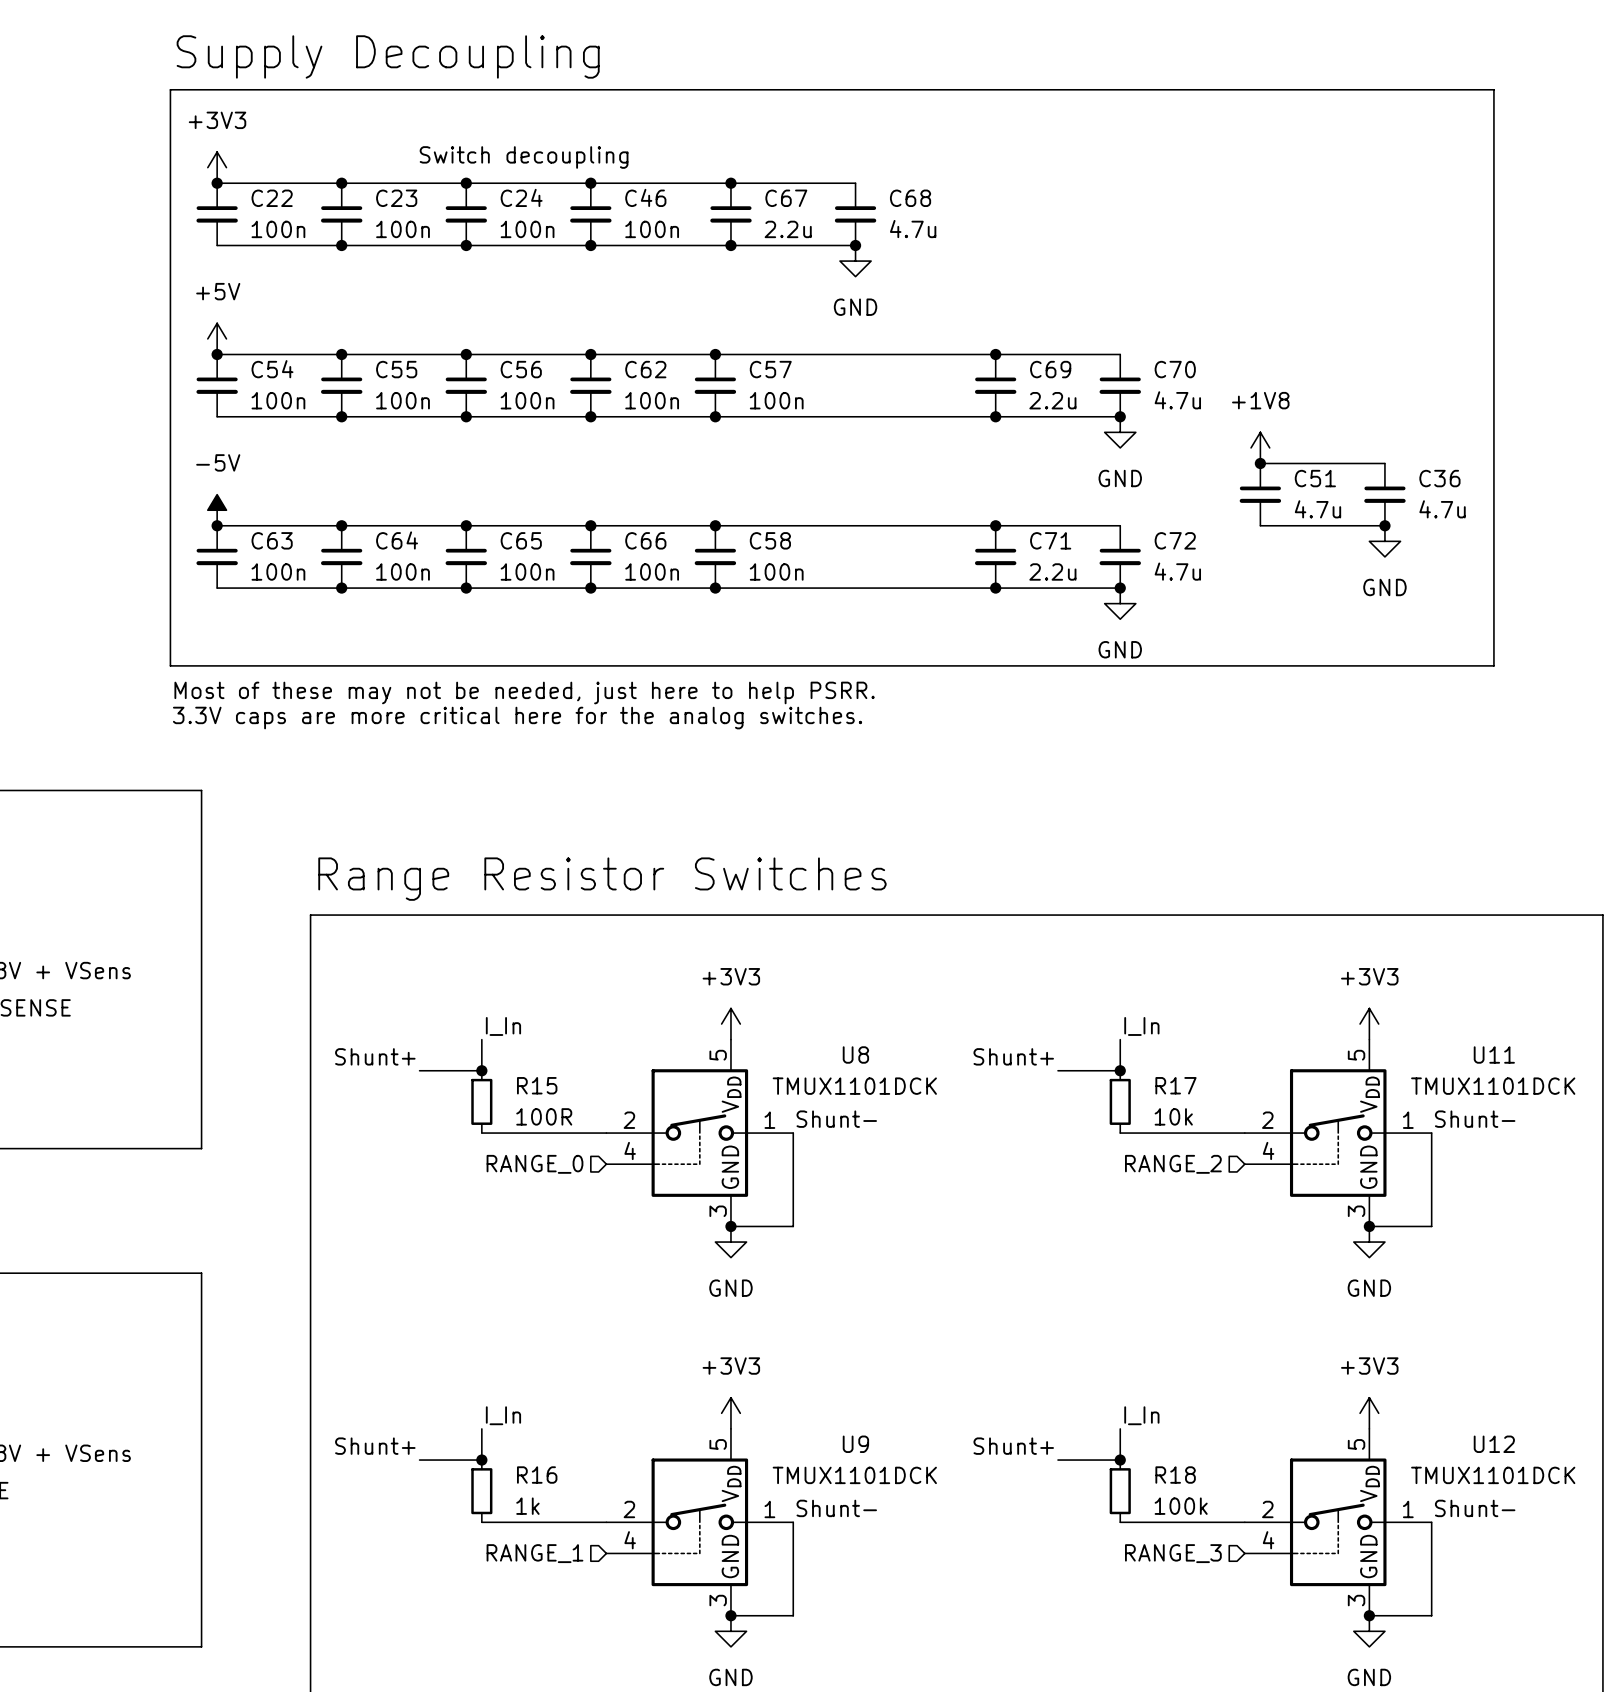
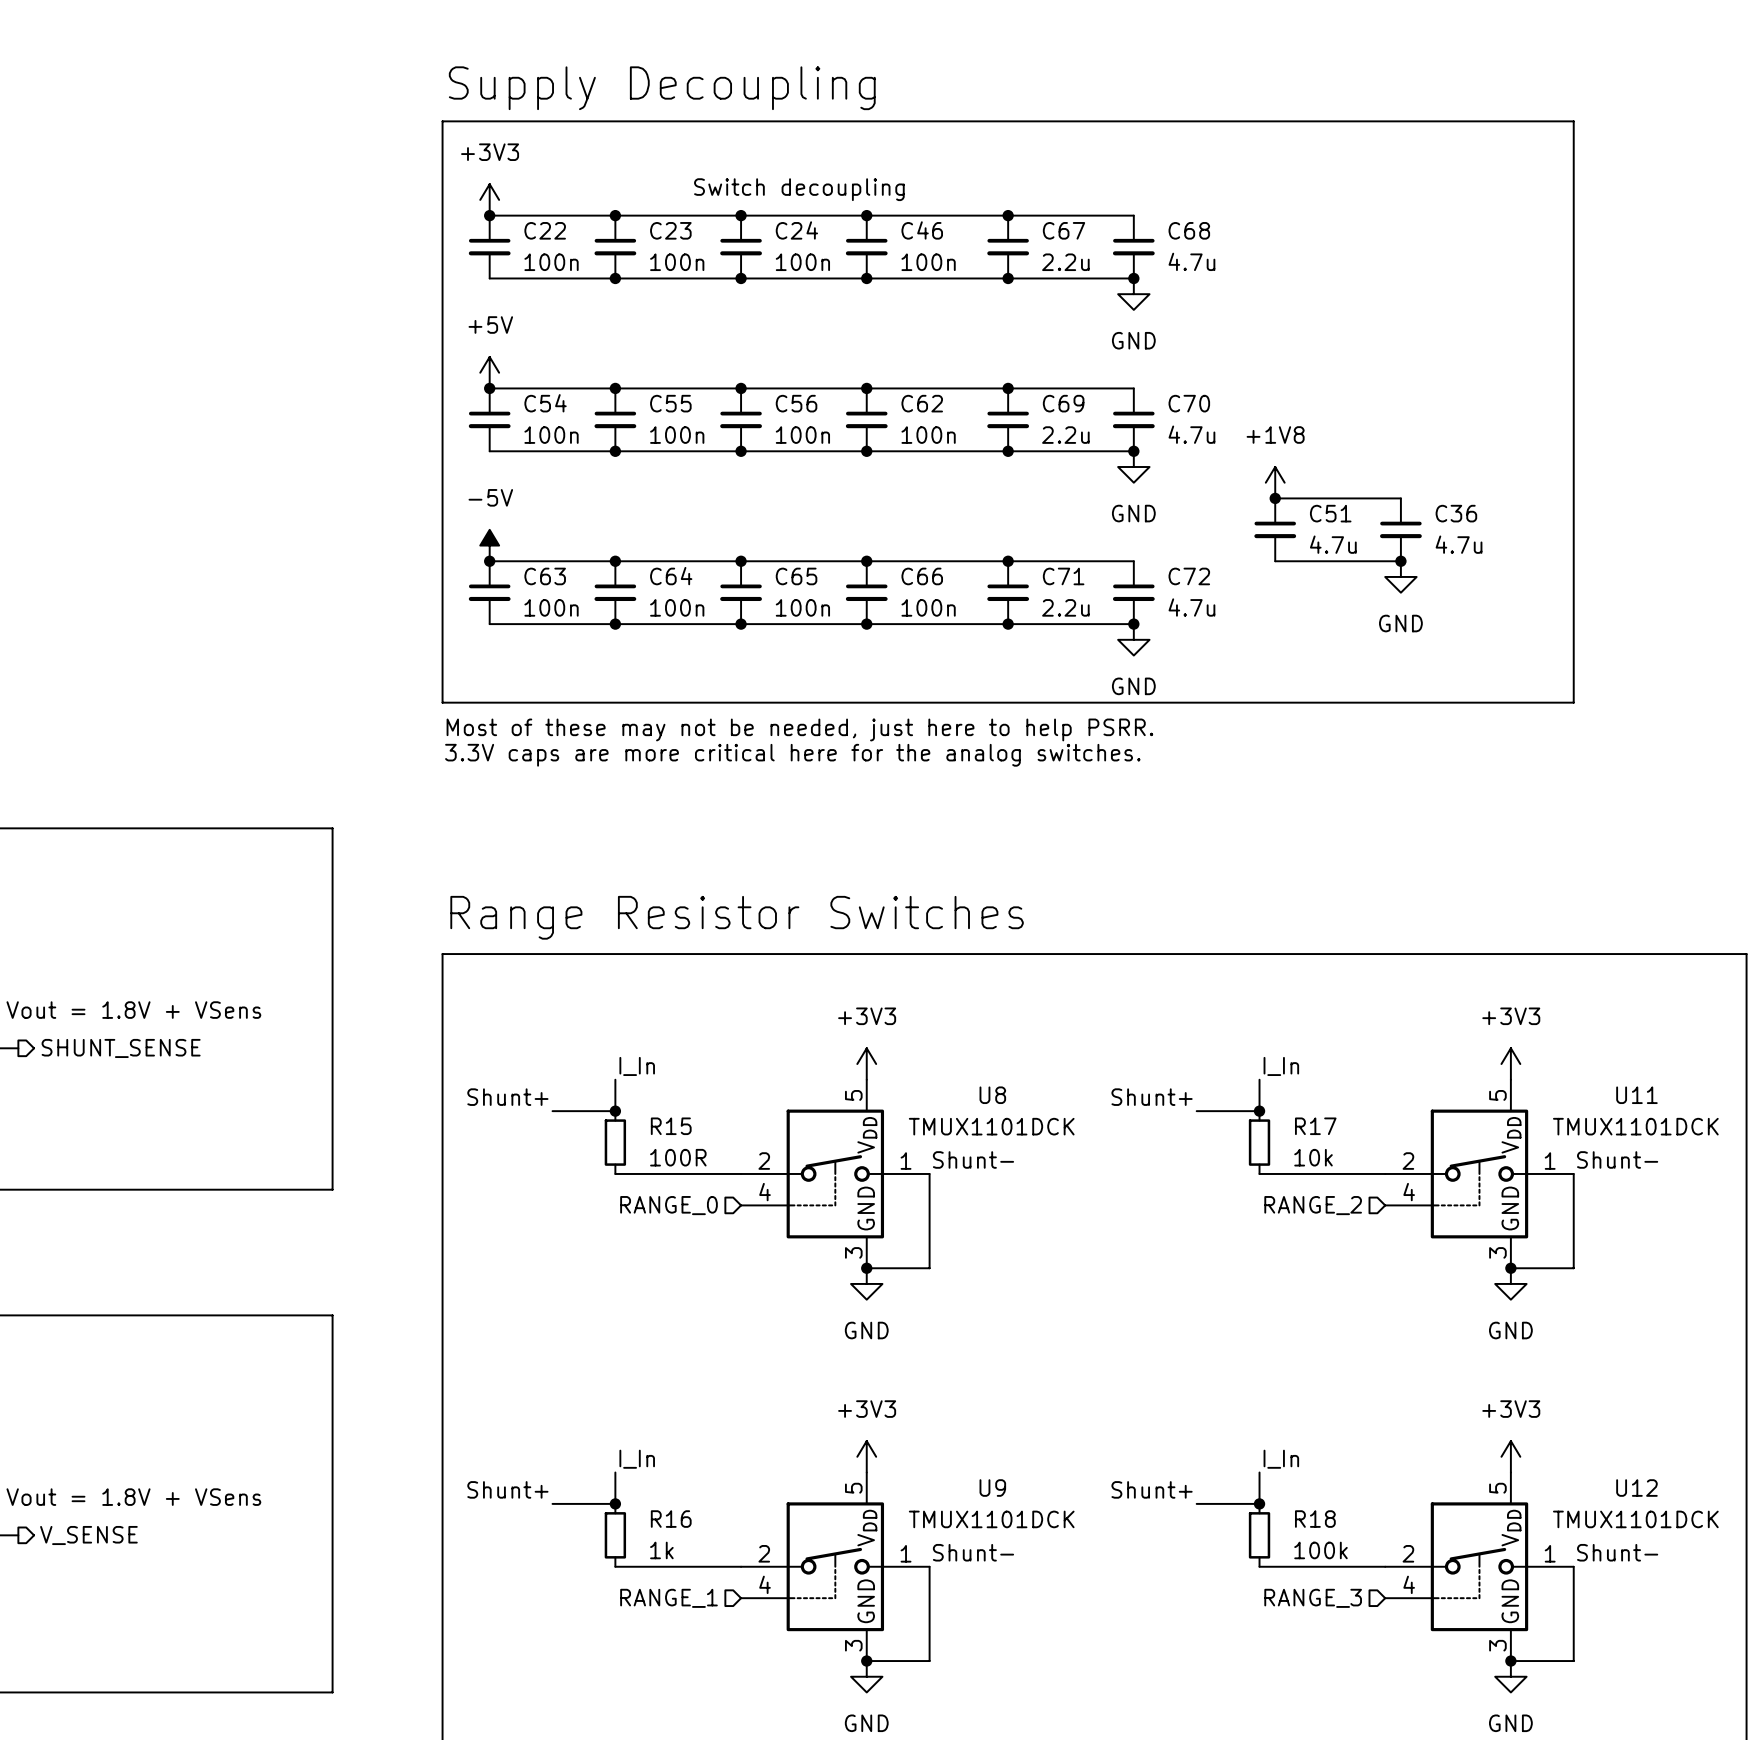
text position: Supply Decoupling (388, 56) -> Supply Decoupling (662, 88)
line: (310, 89) (170, 89) (170, 665) (310, 665) -> (442, 121) (442, 702)
line: (1431, 89) (1493, 89) (1493, 665) (1431, 665) -> (1573, 121) (1573, 702)
text position: Switch decoupling (524, 157) -> Switch decoupling (799, 189)
power symbol position: +3V3 (217, 167) -> +3V3 (489, 199)
wire: (217, 183) (357, 183) -> none
junction: (217, 183) -> none
junction position: (341, 183) -> (489, 215)
junction position: (466, 183) -> (615, 215)
junction position: (590, 183) -> (741, 215)
wire: none -> (992, 215) (1133, 215)
junction: none -> (1008, 215)
C67 name: C67 (786, 198) -> C46 (922, 230)
C22 position: (217, 214) -> (489, 247)
C23 position: (341, 214) -> (615, 247)
C24 position: (466, 214) -> (741, 247)
C46: 100n (590, 214) -> none
C68 position: (855, 214) -> (1133, 247)
C67: none -> 2.2u (1008, 247)
C67 value: 2.2u (788, 229) -> 100n (928, 262)
wire: (217, 245) (357, 245) -> none
junction: (341, 245) -> none
junction position: (466, 245) -> (615, 278)
junction position: (590, 245) -> (741, 278)
wire: none -> (992, 278) (1133, 278)
junction position: (855, 245) -> (1008, 278)
junction: none -> (1133, 278)
power symbol: GND (855, 261) -> none
power symbol: none -> GND (1133, 294)
power symbol position: +5V (217, 338) -> +5V (489, 372)
wire: (217, 354) (357, 354) -> none
junction: (217, 354) -> none
junction position: (341, 354) -> (489, 388)
junction position: (466, 354) -> (615, 388)
junction position: (590, 354) -> (741, 388)
junction position: (715, 354) -> (866, 388)
junction: none -> (1008, 388)
wire: (995, 354) (1120, 354) -> none
junction: (995, 354) -> none
C69 name: C69 (1050, 369) -> C70 (1189, 403)
C54 position: (217, 385) -> (489, 419)
C55 position: (341, 385) -> (615, 419)
C56 position: (466, 385) -> (741, 419)
C62 position: (590, 385) -> (866, 419)
C57: 100n (715, 385) -> none
C69: none -> 2.2u (1008, 419)
C70: 4.7u (1120, 385) -> none
C69 value: 2.2u (1052, 400) -> 4.7u (1191, 434)
wire: (217, 416) (357, 416) -> none
junction: (341, 416) -> none
junction position: (466, 416) -> (615, 451)
junction position: (590, 416) -> (741, 451)
junction position: (715, 416) -> (866, 451)
junction: none -> (1008, 451)
wire: (995, 416) (1120, 416) -> none
junction position: (1120, 416) -> (1275, 498)
power symbol: none -> GND (1133, 467)
power symbol: GND (1120, 432) -> none
power symbol position: +1V8 (1260, 447) -> +1V8 (1275, 482)
wire: (1260, 463) (1384, 463) -> (1400, 498) (1275, 498)
junction: (1260, 463) -> none
C51 name: C51 (1315, 478) -> C36 (1456, 513)
C51: none -> 4.7u (1275, 529)
C36: 4.7u (1384, 494) -> none
power symbol position: -5V (217, 510) -> -5V (489, 545)
wire: (217, 525) (357, 525) -> none
junction: (217, 525) -> none
junction position: (341, 525) -> (489, 561)
junction position: (466, 525) -> (615, 561)
junction position: (590, 525) -> (741, 561)
junction position: (715, 525) -> (866, 561)
junction: none -> (1008, 561)
wire: (995, 525) (1120, 525) -> none
junction: (995, 525) -> none
wire: (1260, 525) (1384, 525) -> (1400, 561) (1275, 561)
junction: none -> (1400, 561)
junction: (1384, 525) -> none
C71 name: C71 (1050, 540) -> C72 (1189, 576)
power symbol: none -> GND (1400, 576)
power symbol: GND (1384, 541) -> none
C63 position: (217, 556) -> (489, 592)
C64 position: (341, 556) -> (615, 592)
C65 position: (466, 556) -> (741, 592)
C66 position: (590, 556) -> (866, 592)
C58: 100n (715, 556) -> none
C71: none -> 2.2u (1008, 592)
C72: 4.7u (1120, 556) -> none
C71 value: 2.2u (1052, 571) -> 4.7u (1191, 607)
wire: (217, 588) (357, 588) -> none
junction: (341, 588) -> none
junction position: (466, 588) -> (615, 624)
junction position: (590, 588) -> (741, 624)
junction position: (715, 588) -> (866, 624)
junction: none -> (1008, 624)
wire: (995, 588) (1120, 588) -> none
junction: (1120, 588) -> none
power symbol: none -> GND (1133, 639)
power symbol: GND (1120, 603) -> none
text position: Most of these may not be needed, just here to help PSRR. (524, 692) -> Most of these may not be needed, just here to help PSRR. (799, 729)
text position: 3.3V caps are more critical here for the analog switches. (517, 718) -> 3.3V caps are more critical here for the analog switches. (792, 755)

